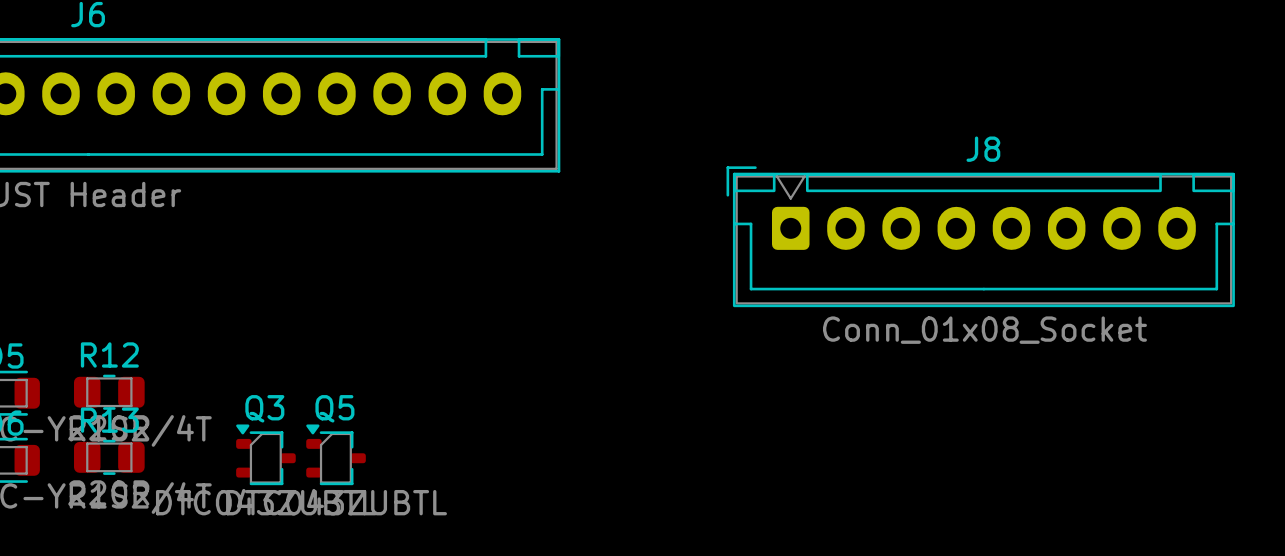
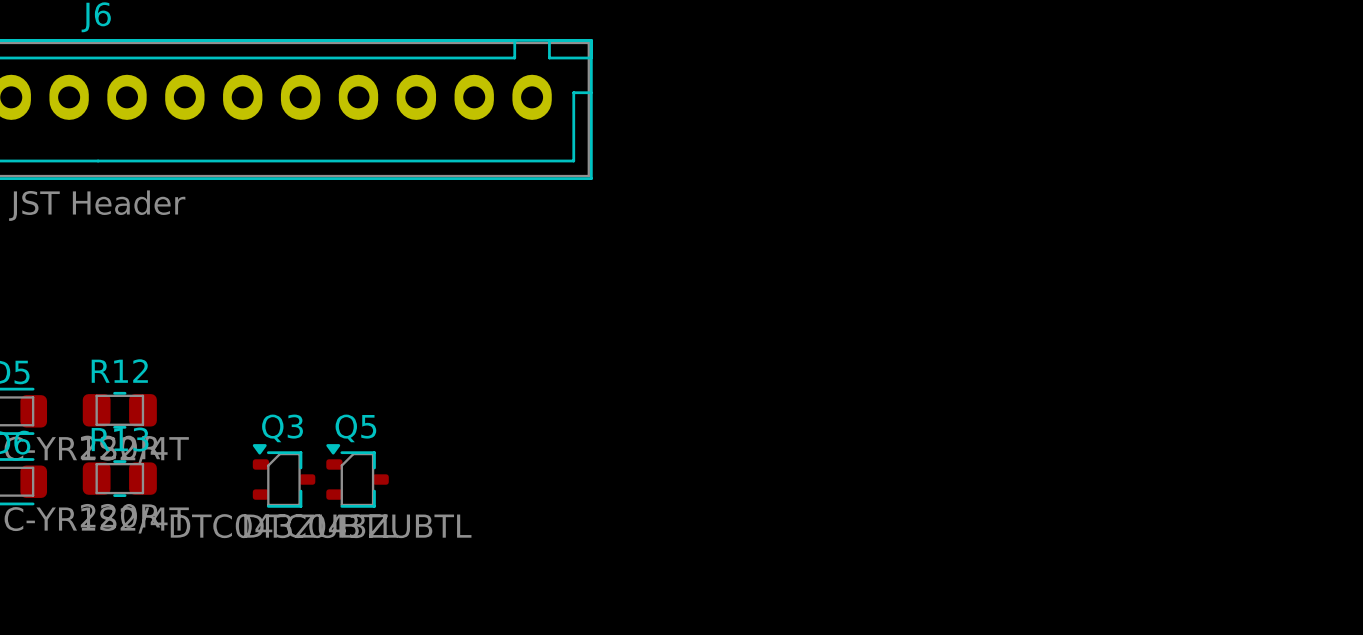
J8: Conn_01x08_Socket (980, 236) -> none

